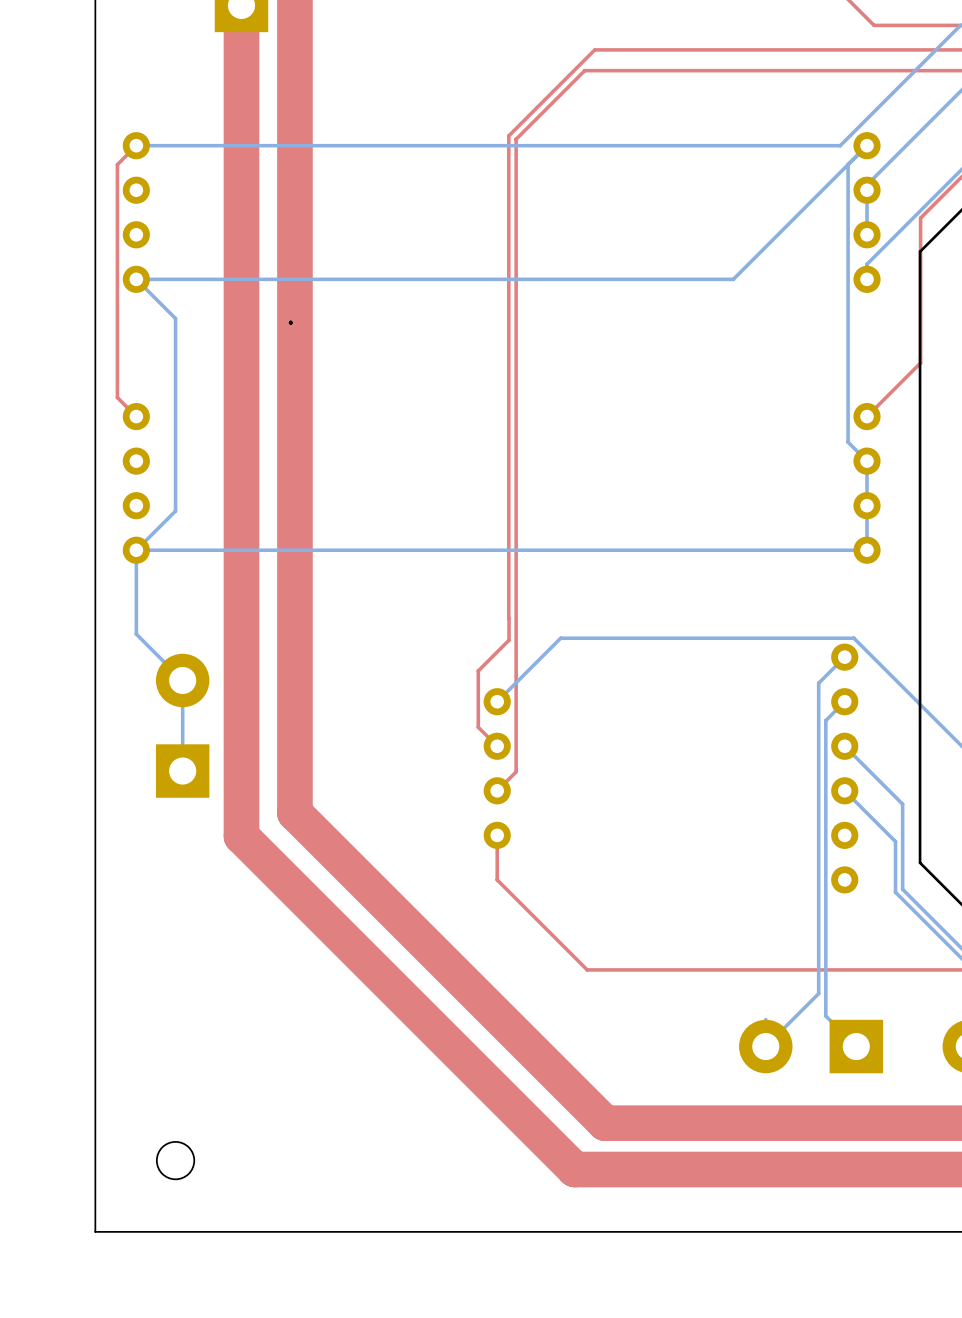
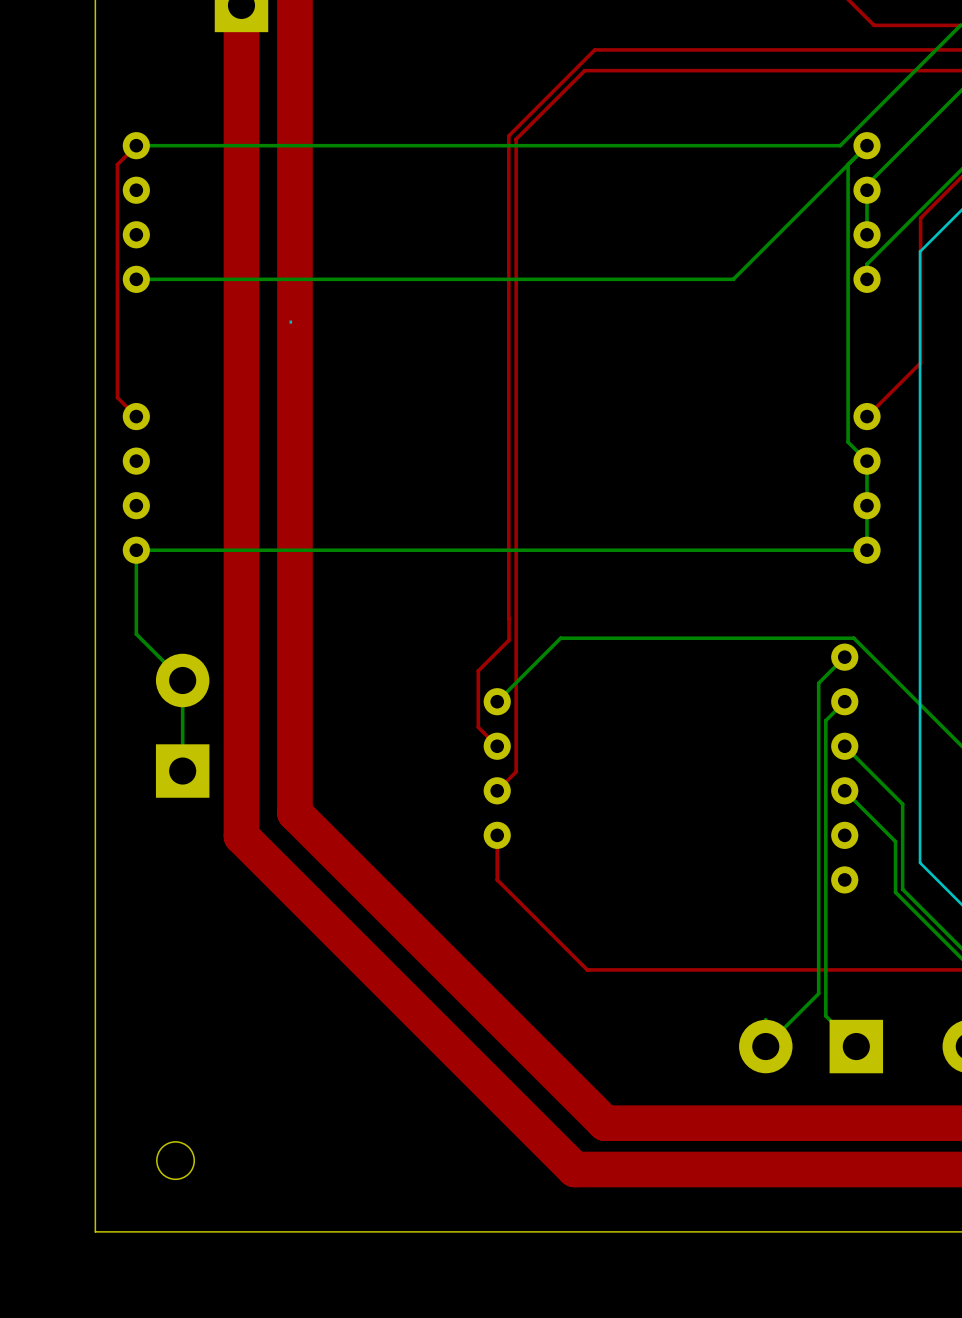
bottom track: (136, 279) (175, 318) (175, 511) (136, 550) -> none

